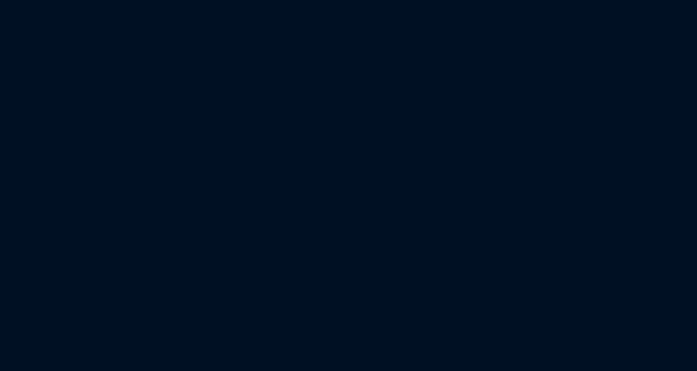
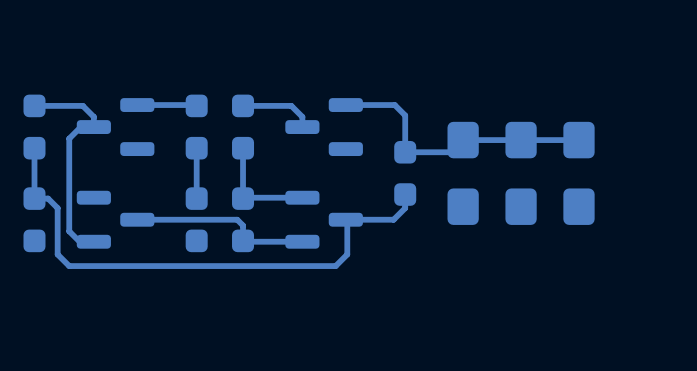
bottom track: none -> (34, 105) (82, 105) (93, 116) (93, 127) (80, 127) (69, 138) (69, 231) (79, 241) (93, 241)
bottom track: none -> (137, 105) (196, 105)
bottom track: none -> (243, 105) (291, 105) (302, 116) (302, 127)
bottom track: none -> (345, 105) (394, 105) (405, 115) (405, 152) (450, 152) (463, 140) (578, 140)
part: none -> (34, 127)
part: none -> (115, 127)
part: none -> (196, 127)
part: none -> (243, 127)
part: none -> (324, 127)
bottom track: none -> (34, 148) (34, 198) (48, 198) (57, 208) (57, 254) (69, 266) (335, 266) (347, 254) (345, 219) (393, 219) (405, 208) (405, 194)
bottom track: none -> (196, 148) (196, 198)
bottom track: none -> (243, 148) (243, 198) (302, 197)
part: none -> (405, 173)
part: none -> (463, 173)
part: none -> (521, 173)
part: none -> (578, 173)
part: none -> (34, 219)
part: none -> (115, 219)
bottom track: none -> (137, 219) (237, 219) (243, 225) (243, 241) (302, 241)
part: none -> (196, 219)
part: none -> (243, 219)
part: none -> (324, 219)

